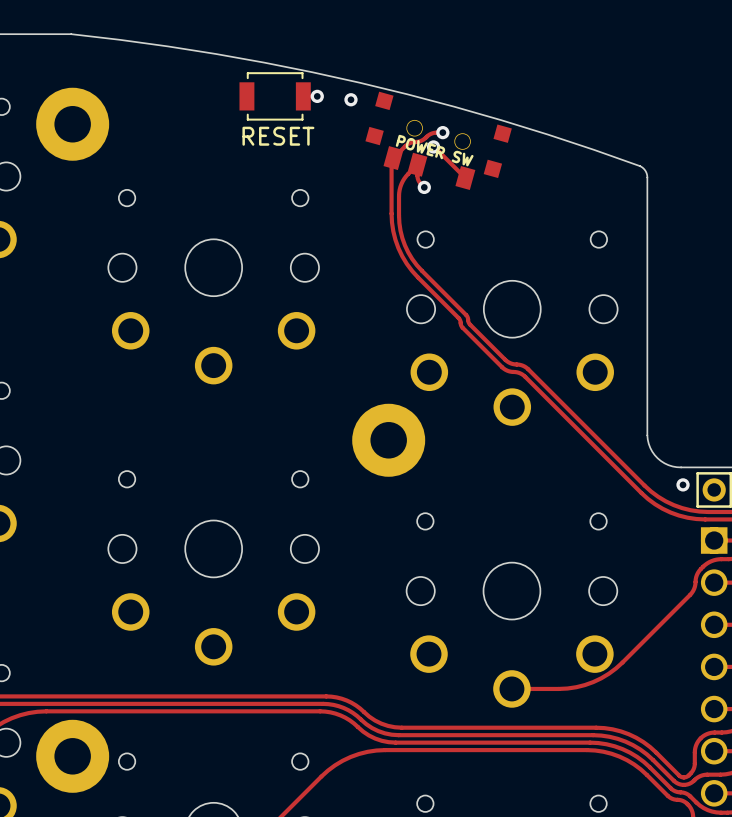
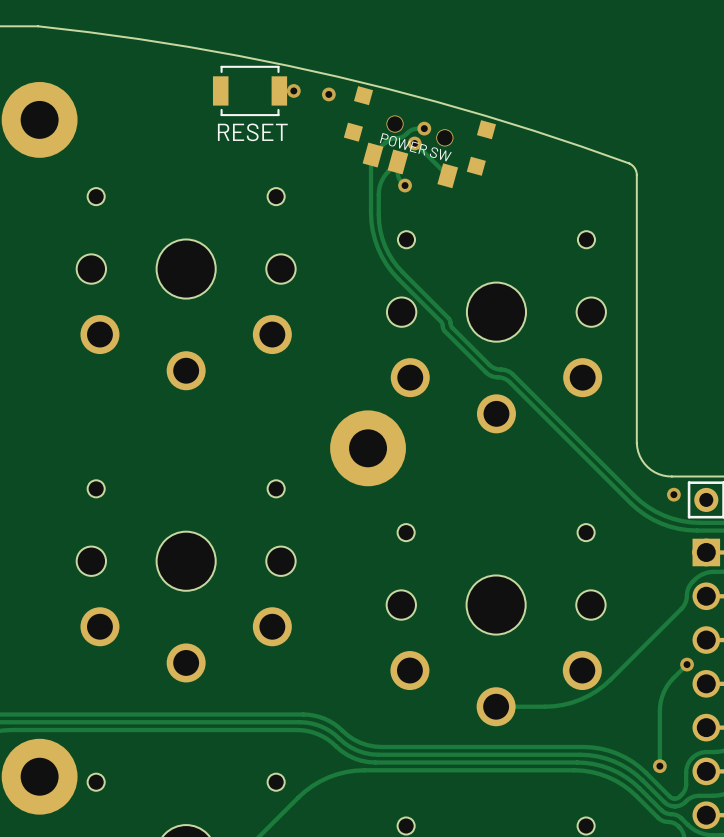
track: none -> (687, 664) (670, 681) (661, 697) (659, 710) (659, 766)
via: none -> (687, 664)
via: none -> (659, 766)

